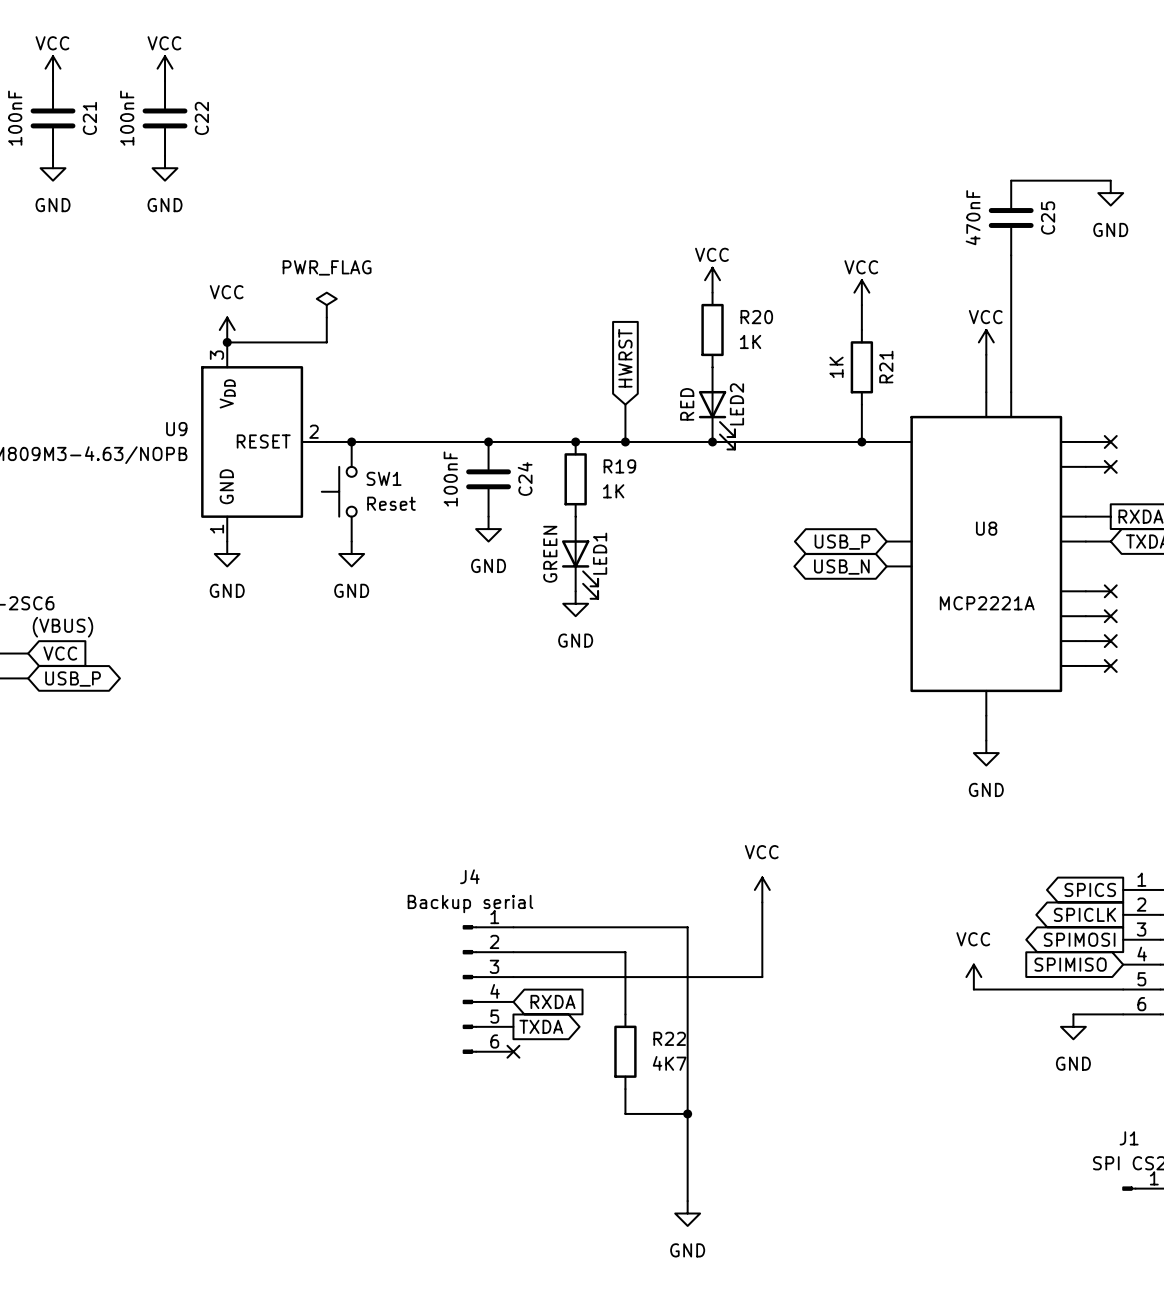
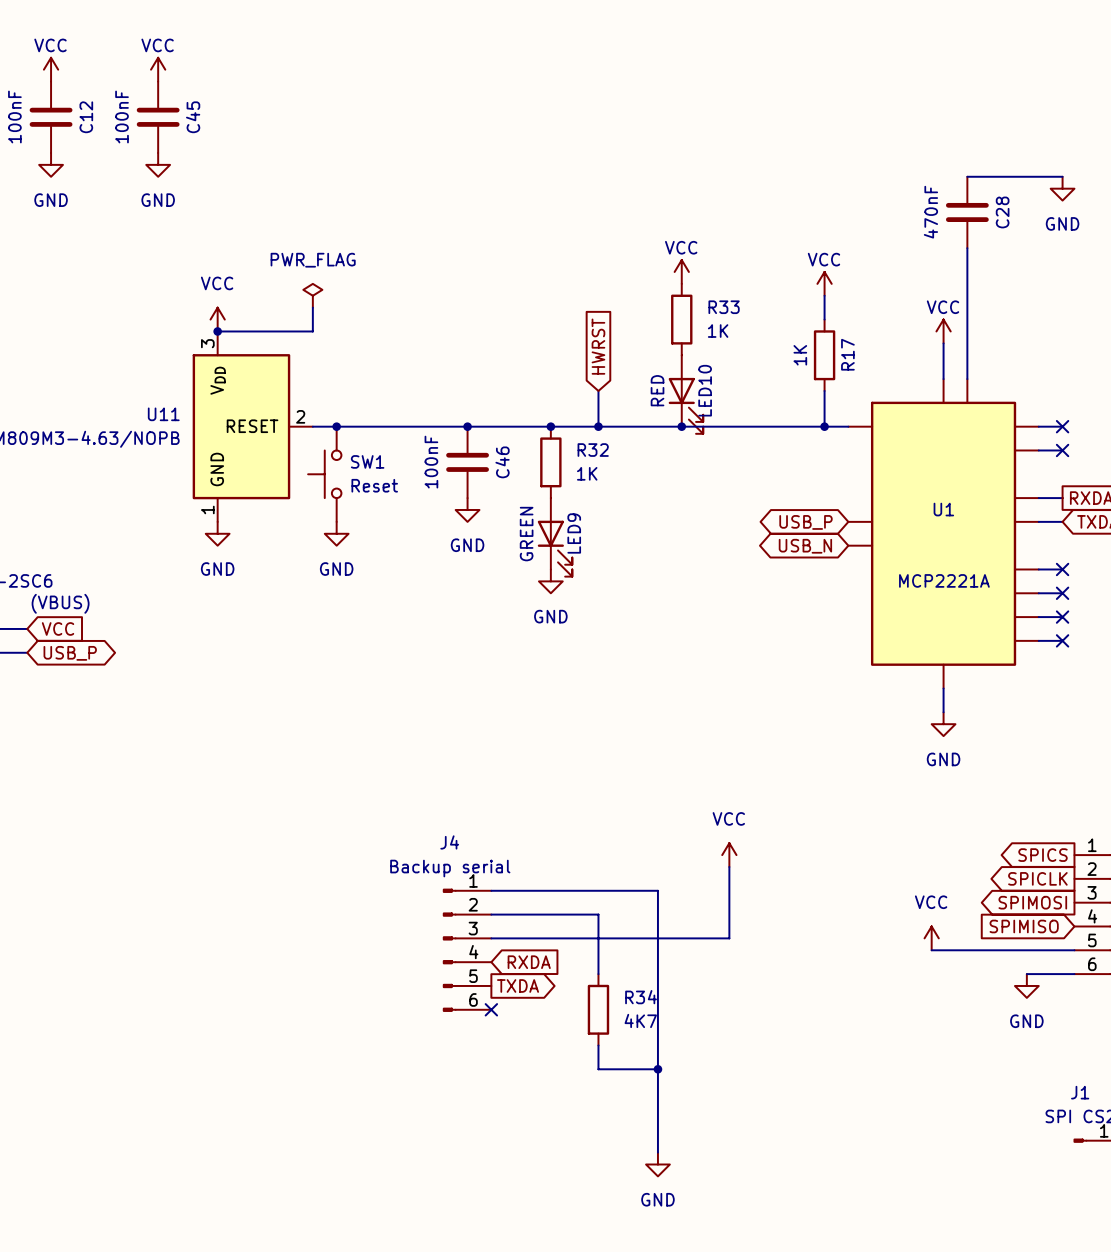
C21 name: C21 (89, 118) -> C12 (86, 117)
C22 name: C22 (201, 118) -> C45 (193, 117)
C25 name: C25 (1048, 217) -> C28 (1002, 212)
R20 name: R20 (756, 317) -> R33 (724, 307)
R21 name: R21 (886, 367) -> R17 (847, 354)
LED2 name: LED2 (736, 404) -> LED10 (705, 390)
U9 name: U9 (176, 429) -> U11 (163, 414)
R19 name: R19 (619, 466) -> R32 (593, 450)
C24 name: C24 (525, 479) -> C46 (502, 462)
U8 name: U8 (986, 528) -> U1 (943, 509)
LED1 name: LED1 (600, 553) -> LED9 (574, 533)
R22 name: R22 (669, 1038) -> R34 (641, 997)

